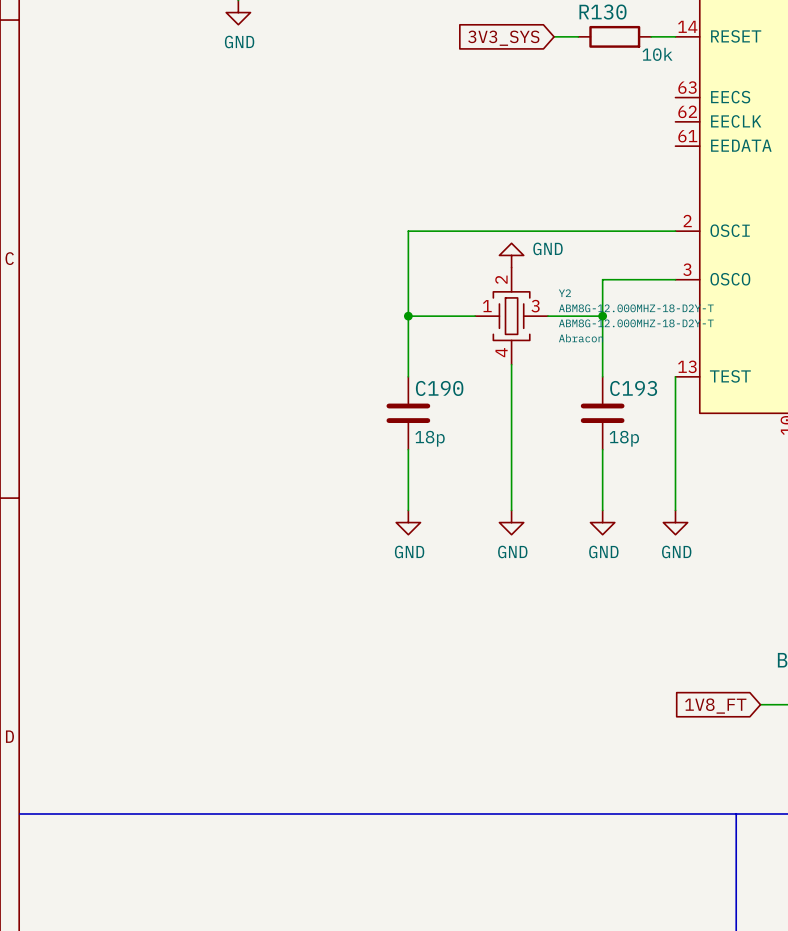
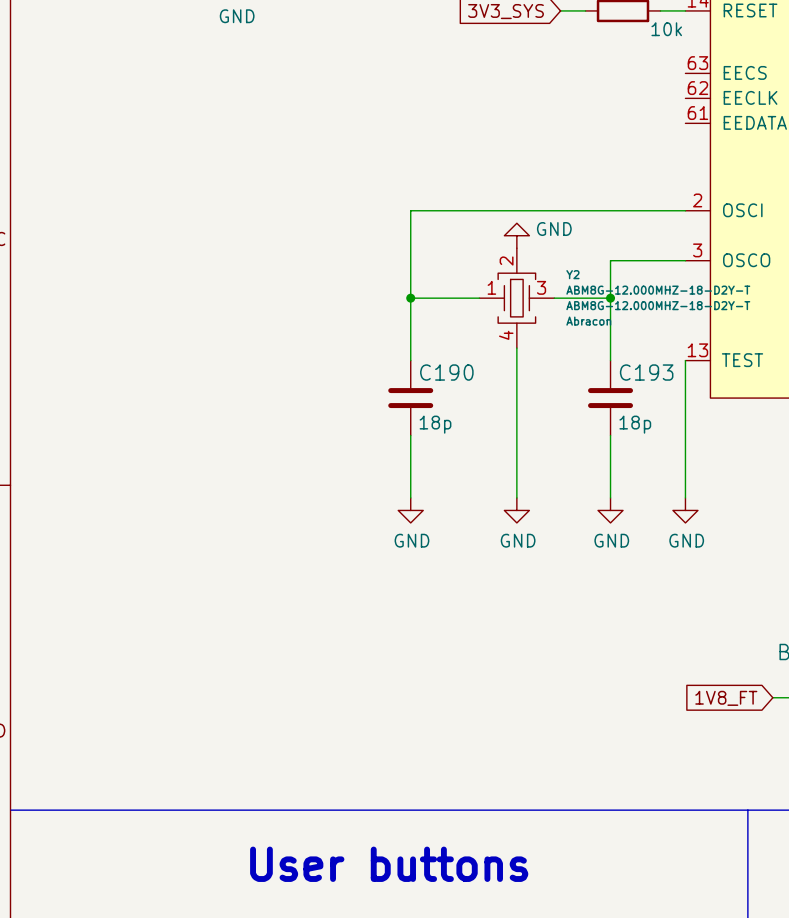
text: none -> User buttons (389, 864)

